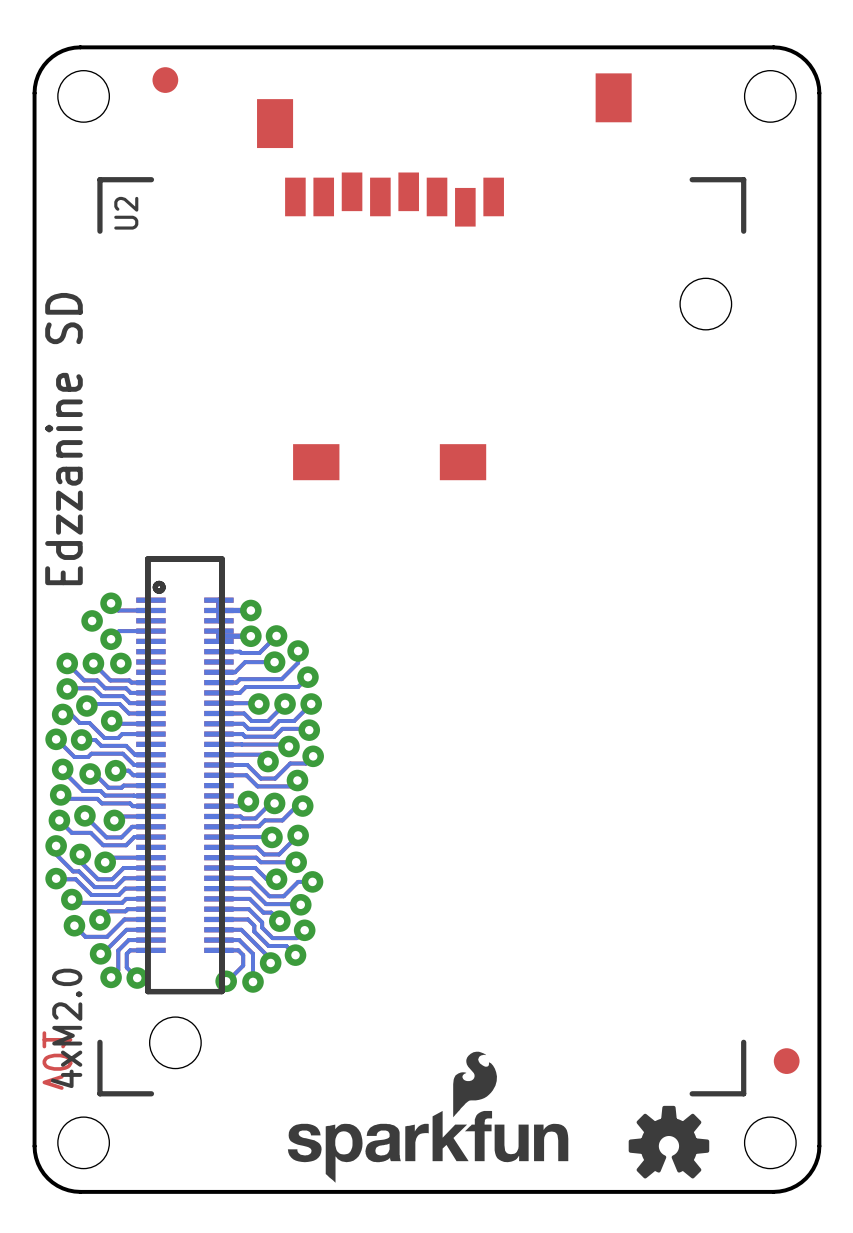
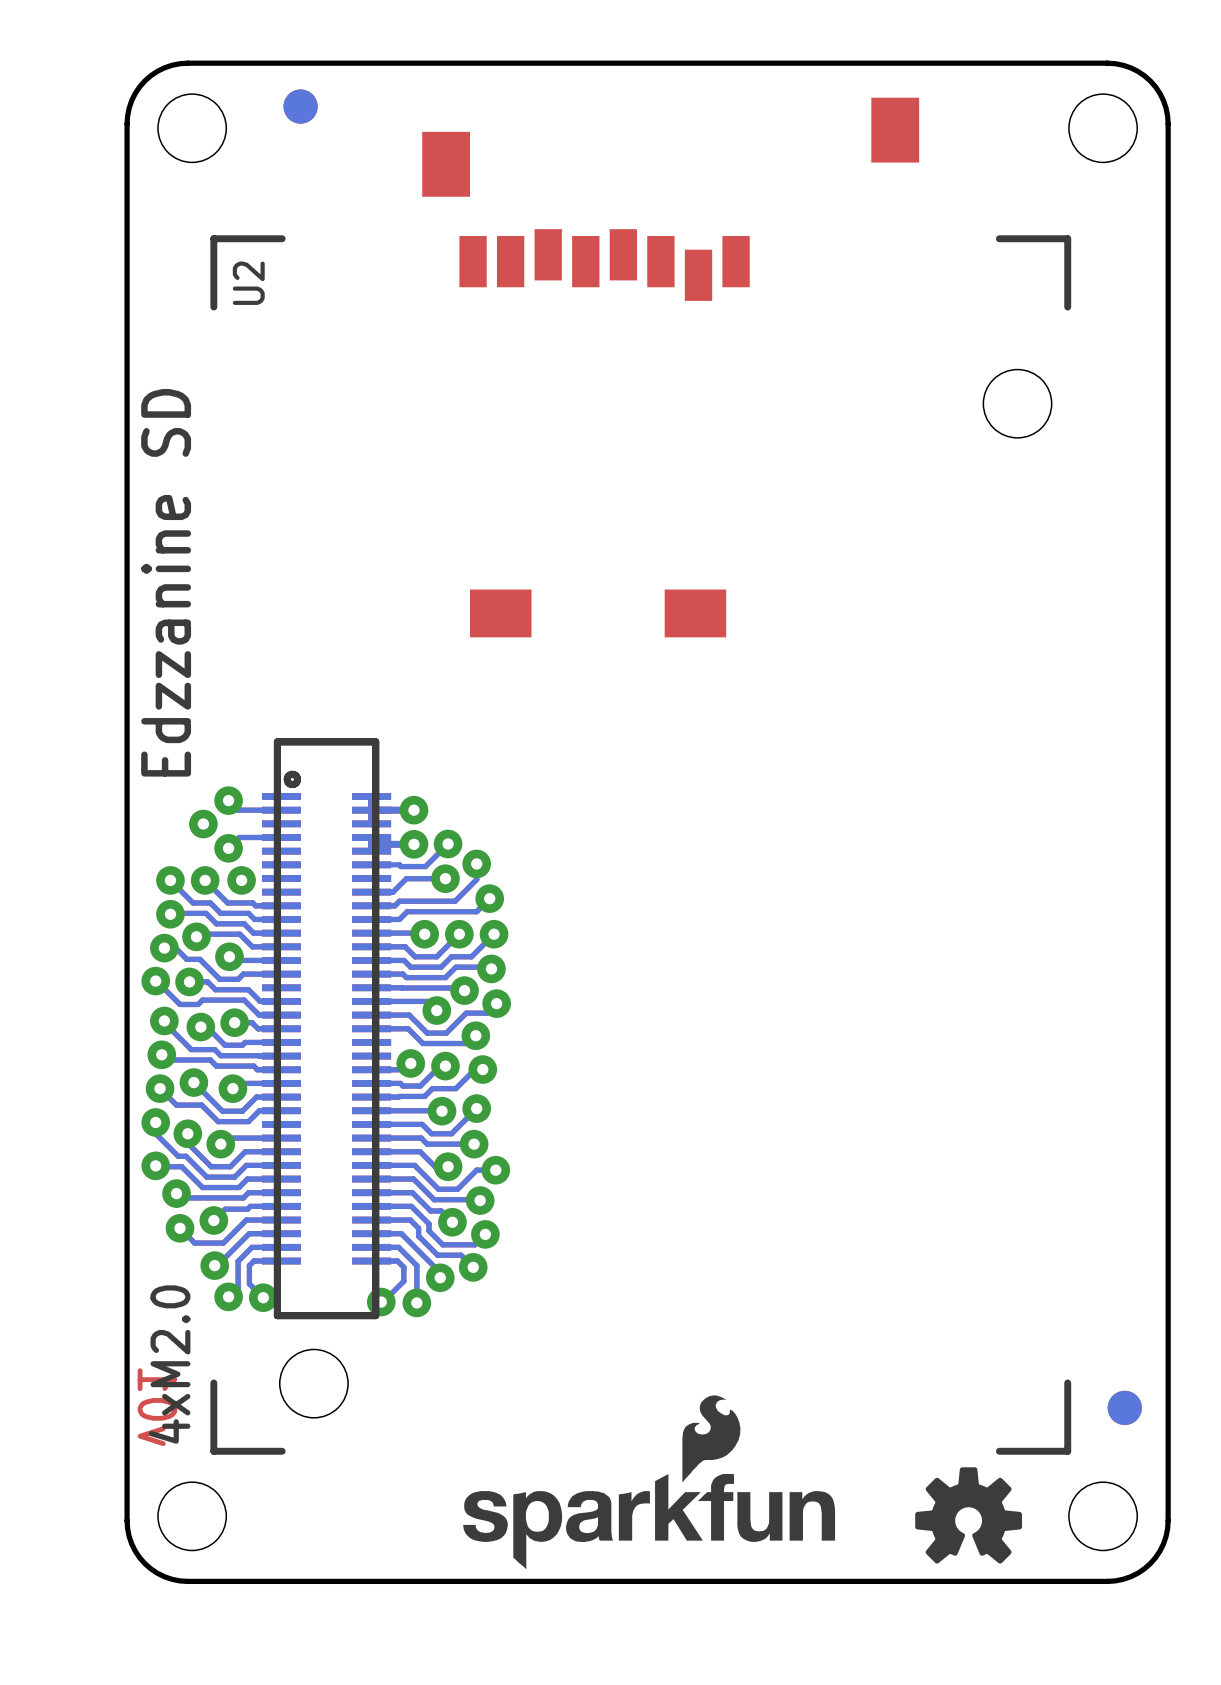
part: none -> (300, 106)
part: none -> (1124, 1407)

